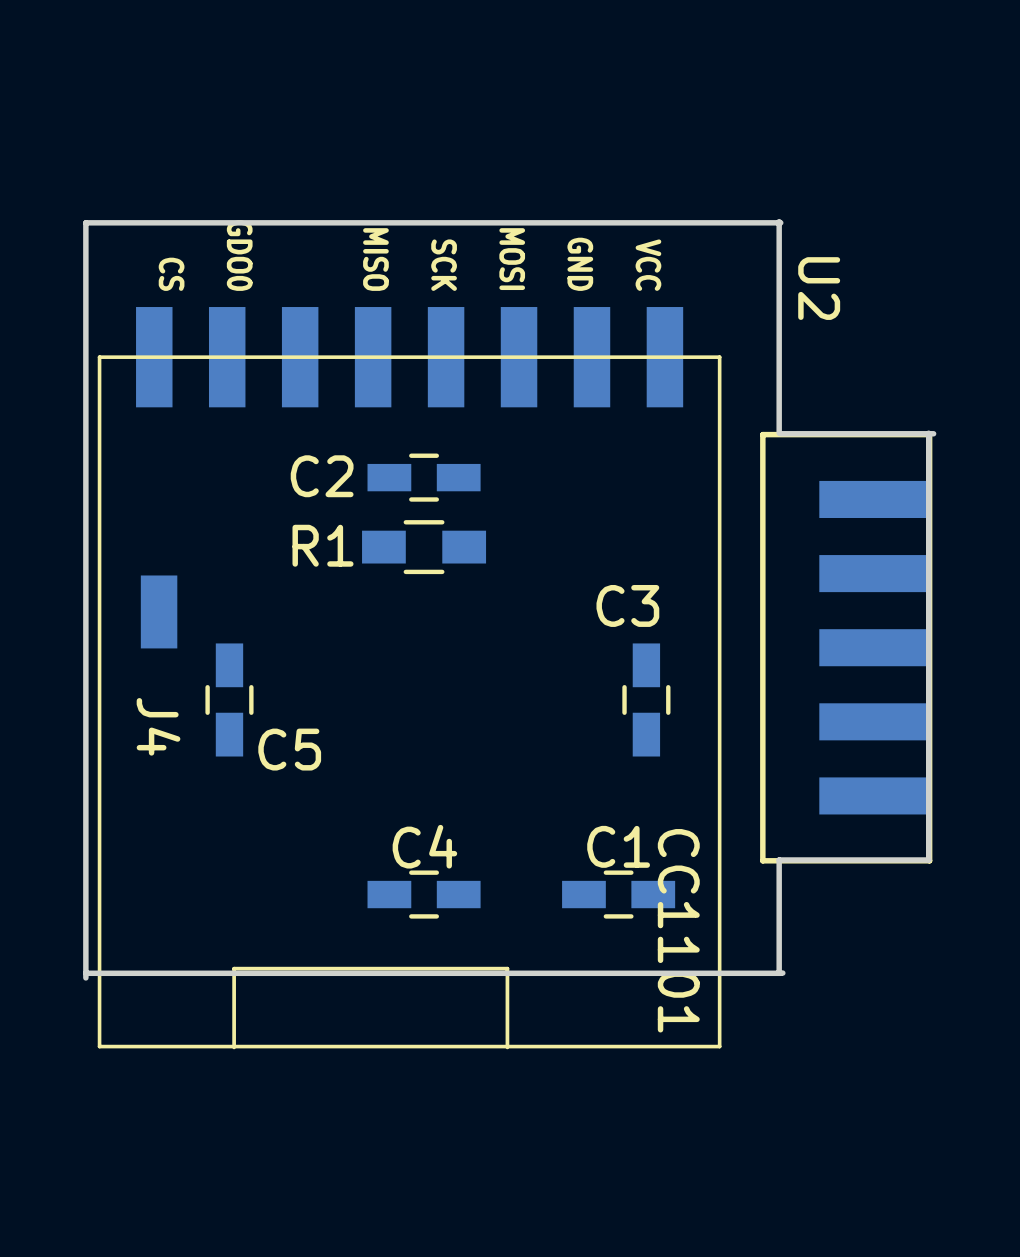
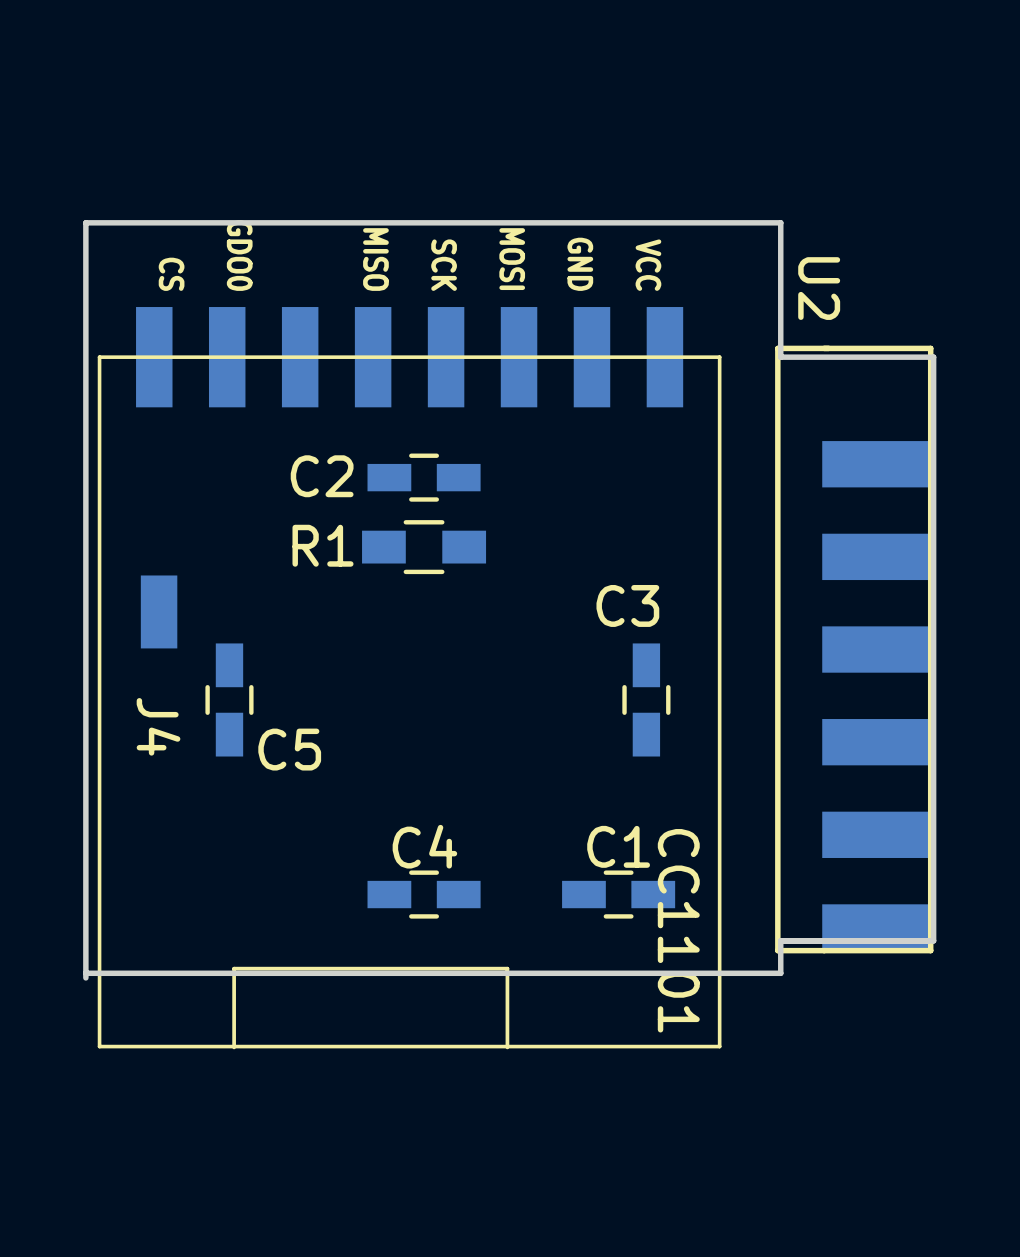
board edge: (779, 221) (779, 433) -> none
board edge: none -> (780, 222) (780, 357) (933, 357) (933, 940) (780, 940) (780, 973)
part footprint: [760, 431, 933, 864] -> [775, 345, 934, 954]
board edge: (928, 433) (928, 859) (779, 859) (779, 973) (782, 973) -> none
board edge: (933, 433) (780, 433) -> none

